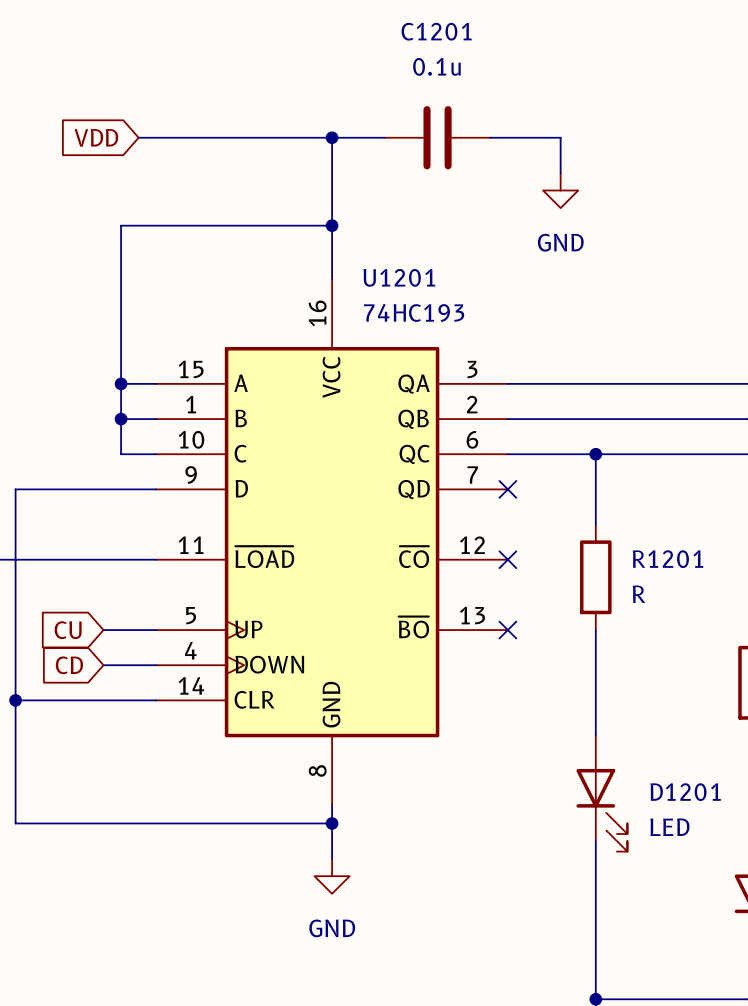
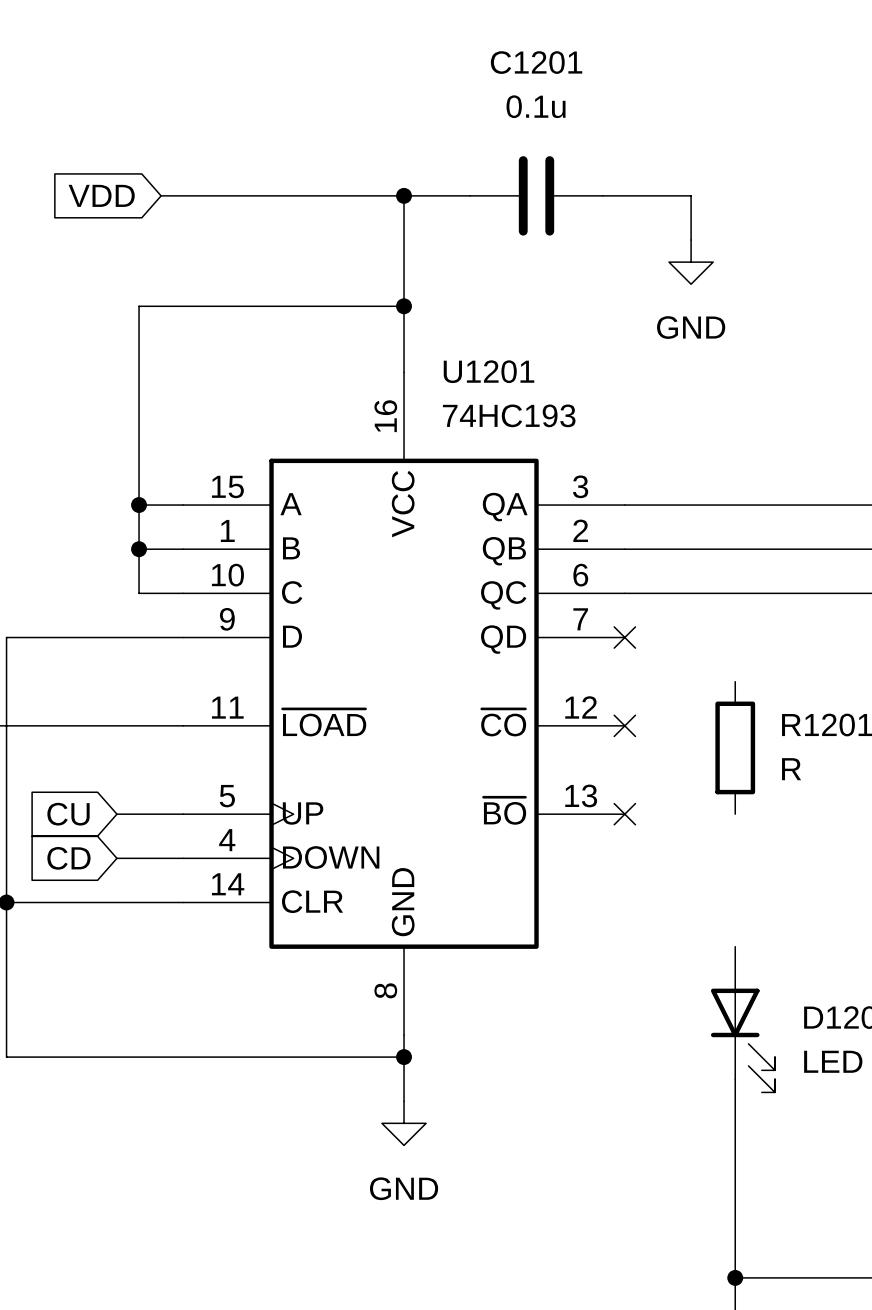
wire: (595, 454) (595, 524) -> none
junction: (595, 454) -> none
wire: (595, 630) (595, 735) -> none

